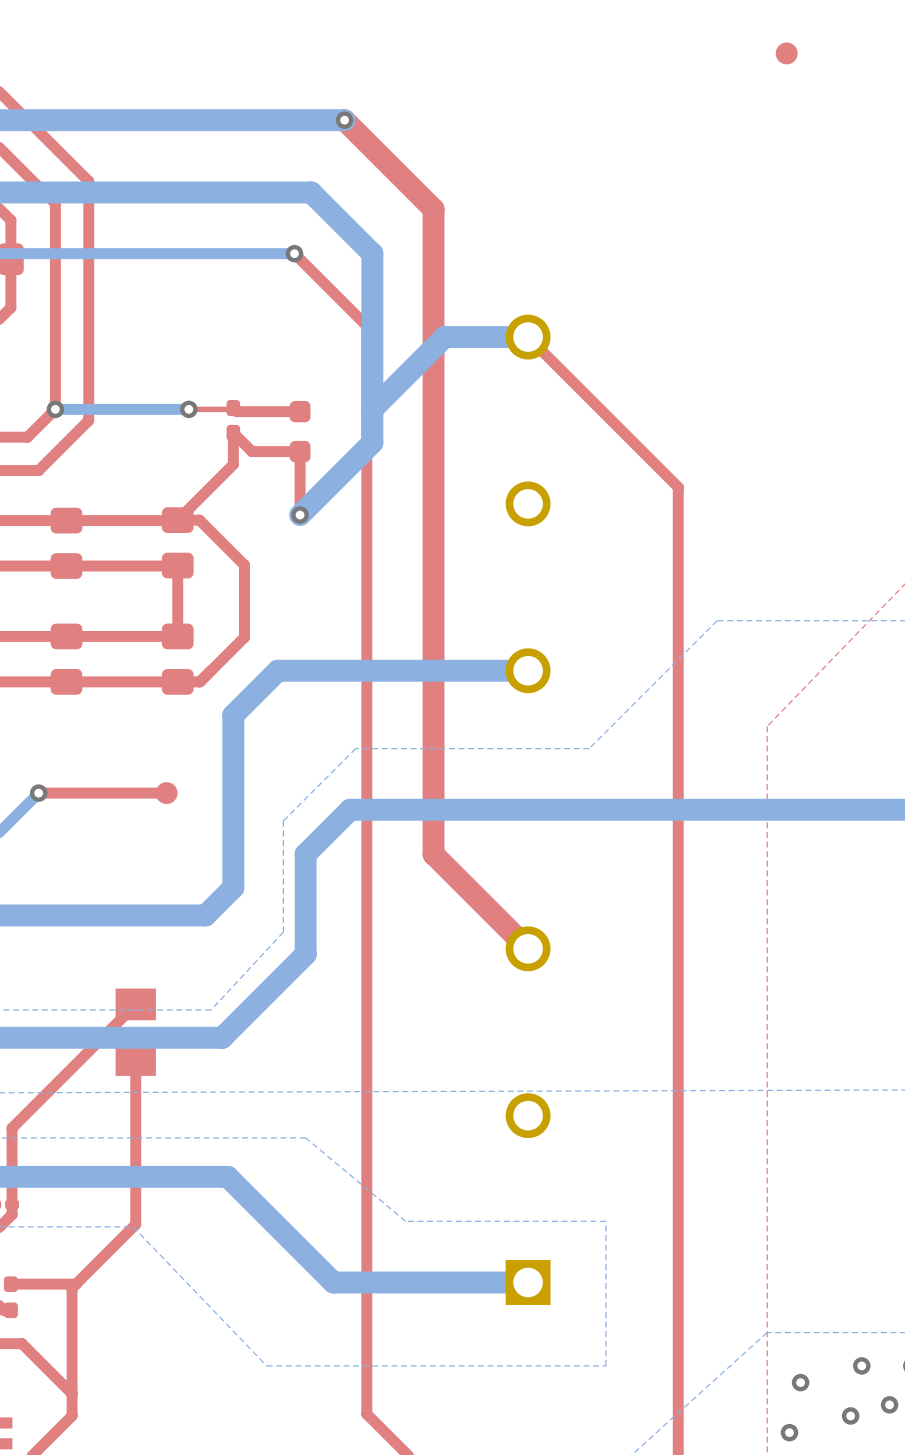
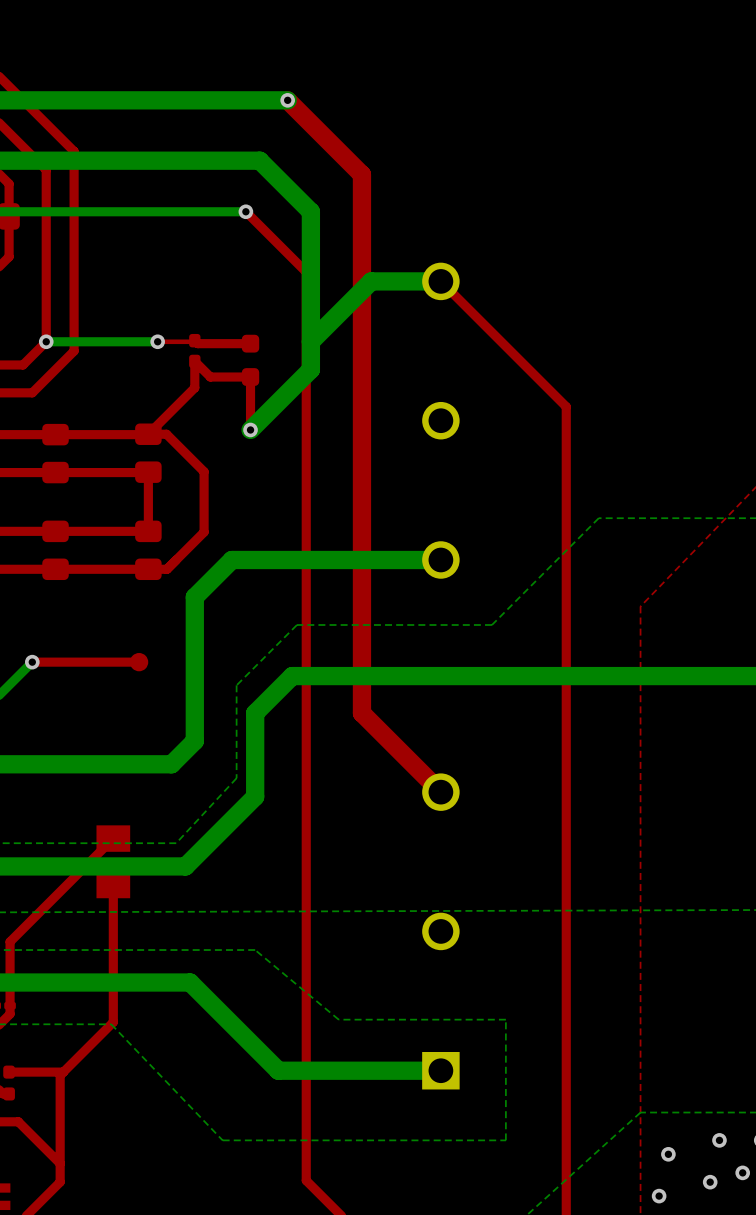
part: (786, 53) -> none

